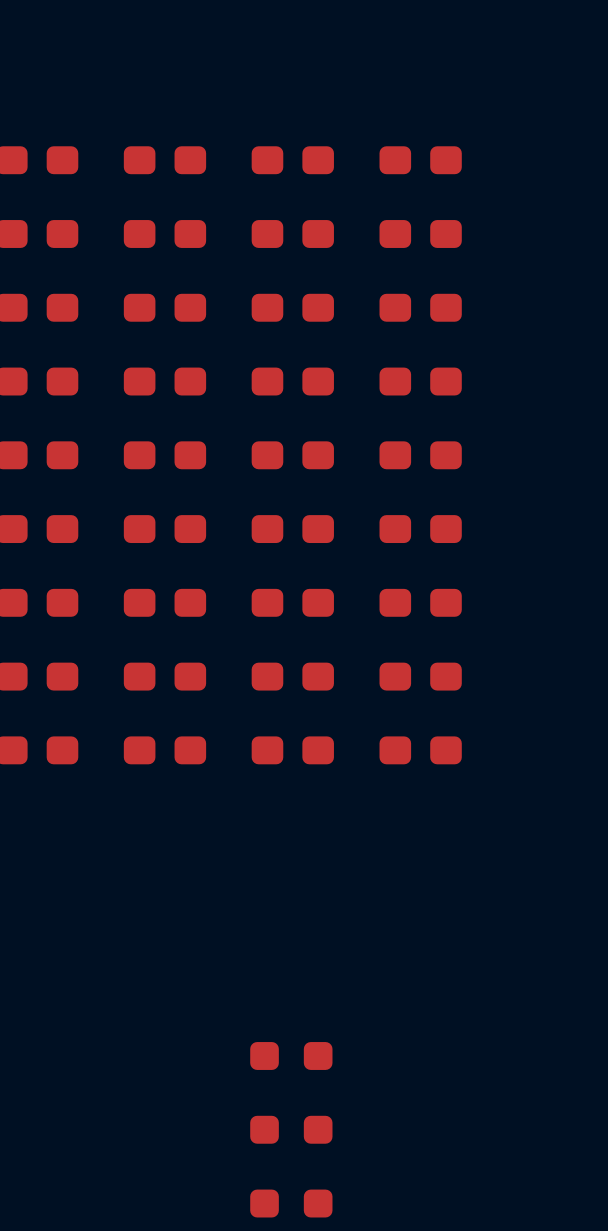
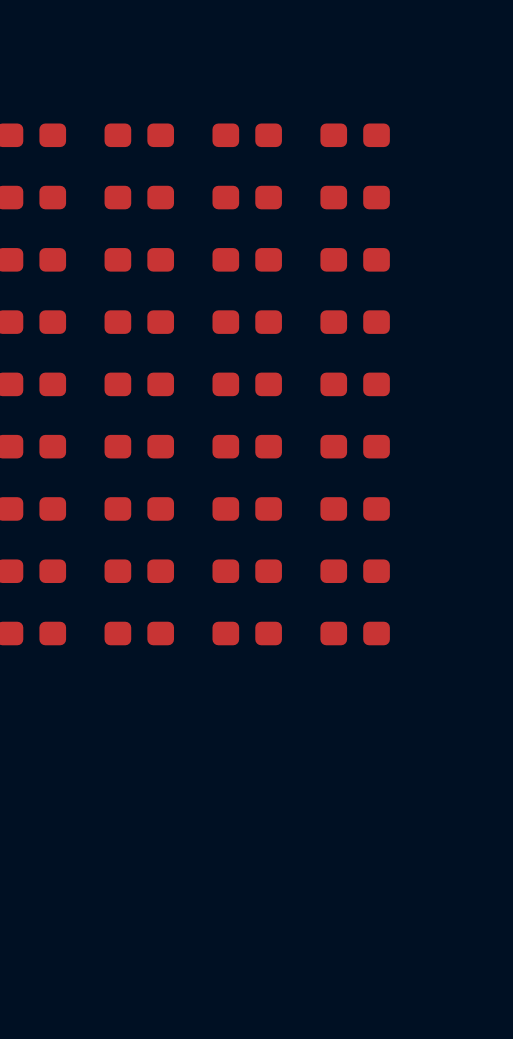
part: (291, 1056) -> none
part: (291, 1129) -> none
part: (291, 1203) -> none

